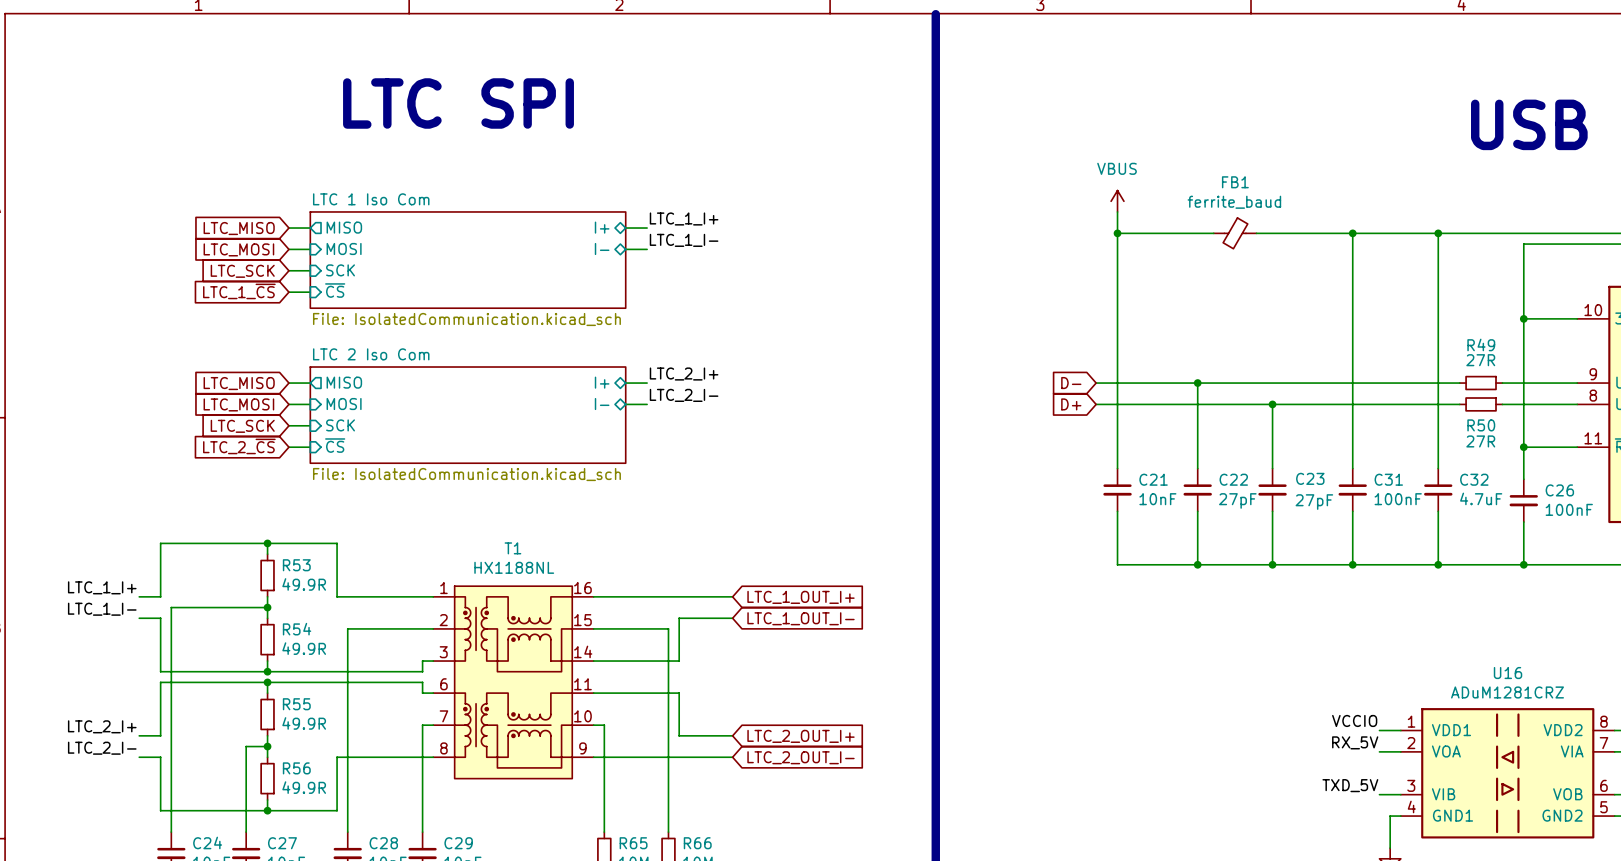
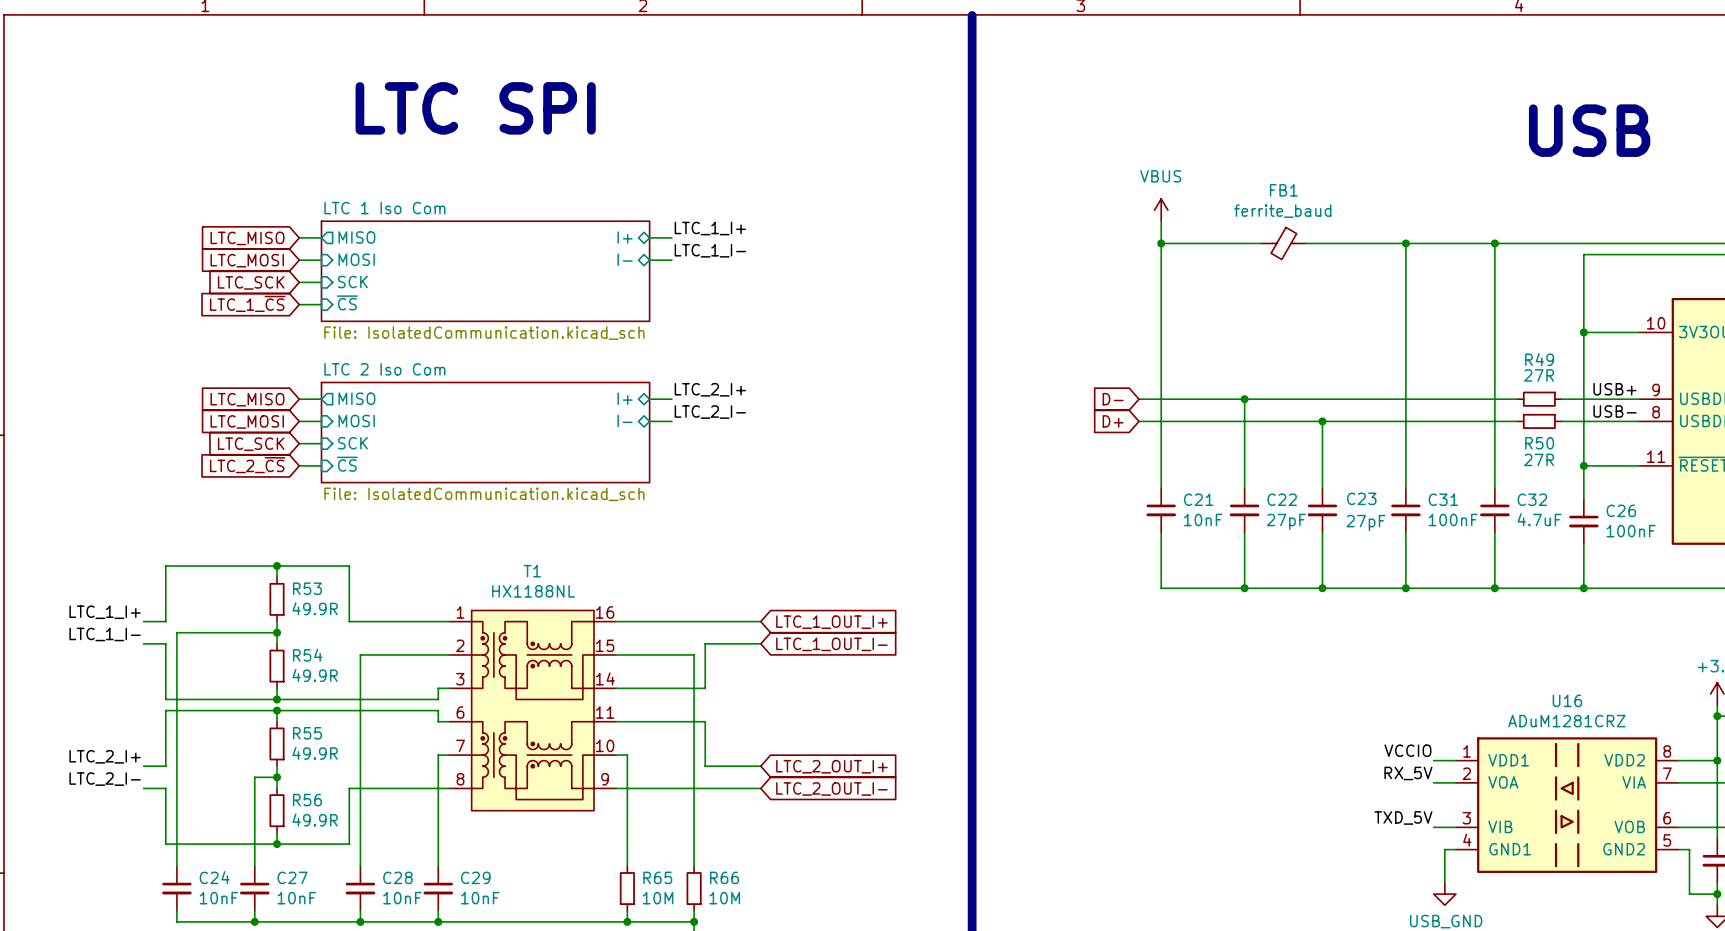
label: none -> USB+ (1615, 389)
label: none -> USB- (1615, 411)

